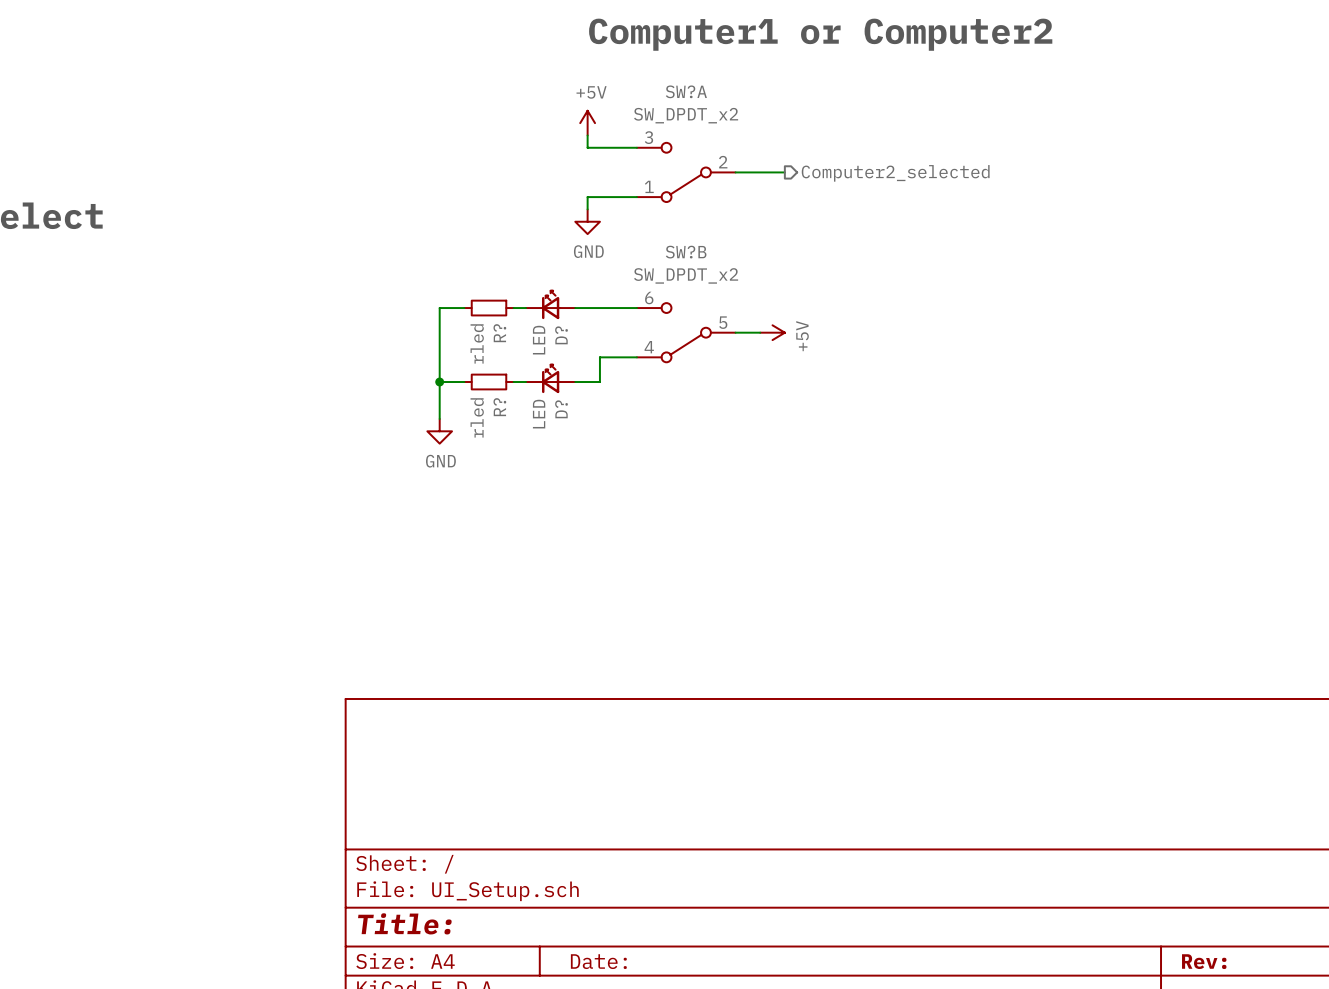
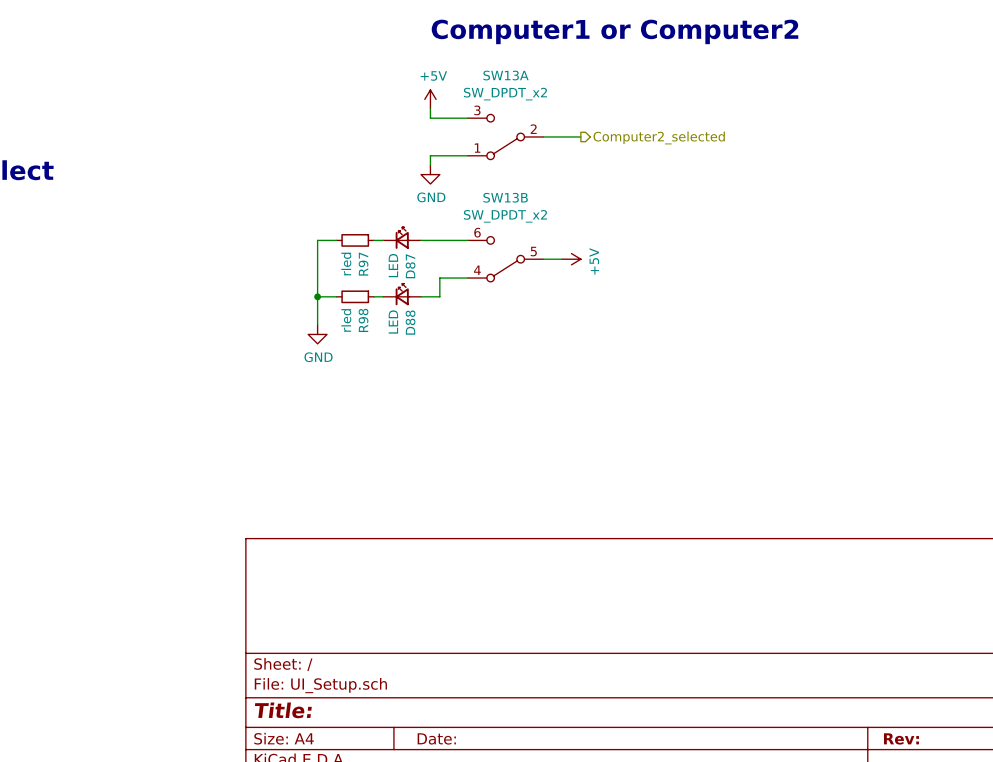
SW?A name: SW?A (686, 91) -> SW13A (506, 75)
SW?B name: SW?B (686, 252) -> SW13B (505, 197)
R? name: R? (499, 333) -> R97 (363, 264)
D? name: D? (561, 335) -> D87 (410, 266)
R? name: R? (499, 407) -> R98 (363, 320)
D? name: D? (561, 409) -> D88 (410, 322)

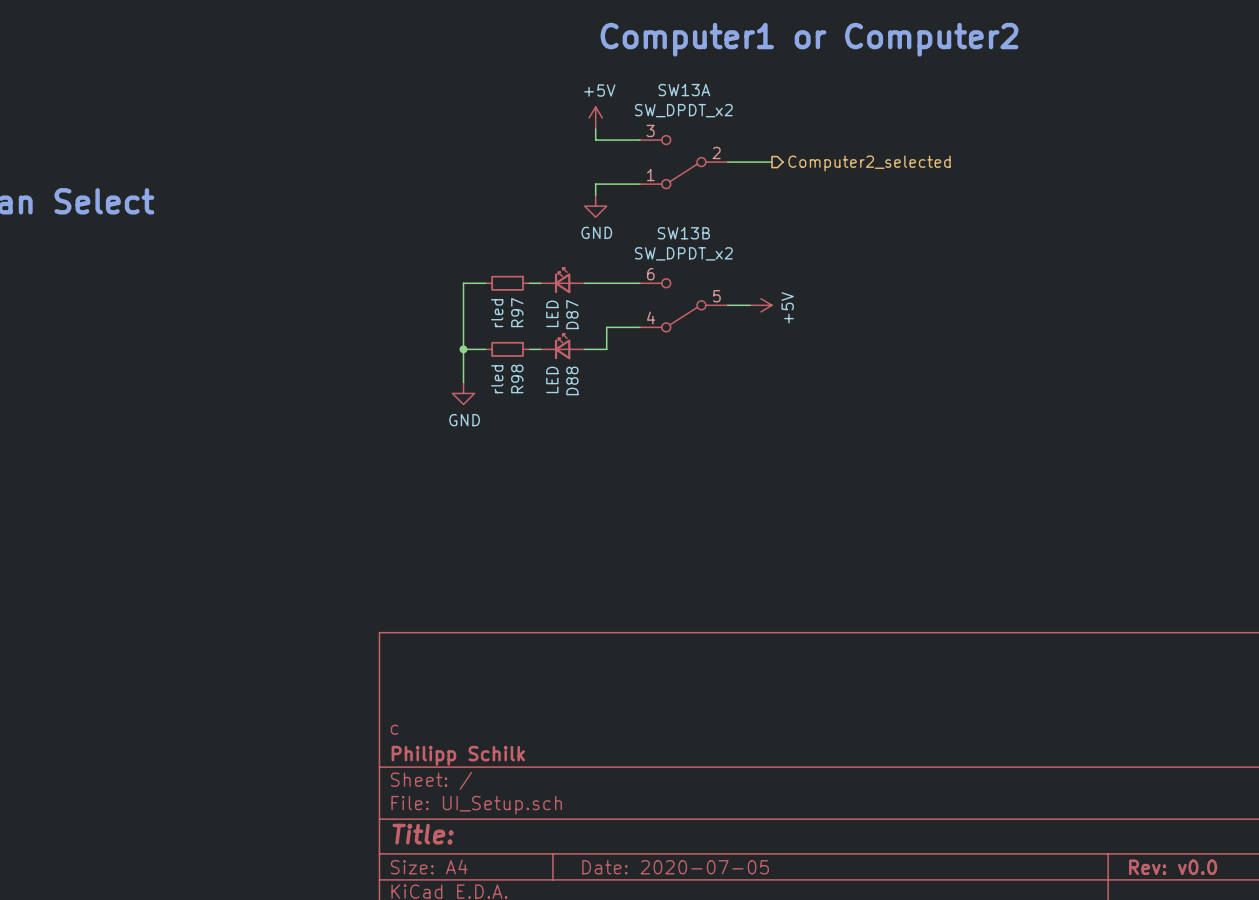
title block: none -> c (394, 729)
title block: none -> Philipp Schilk (458, 755)
title block: Date: (436, 738) -> Date: 2020-07-05 (675, 867)
title block: Rev: (901, 738) -> Rev: v0.0 (1173, 867)

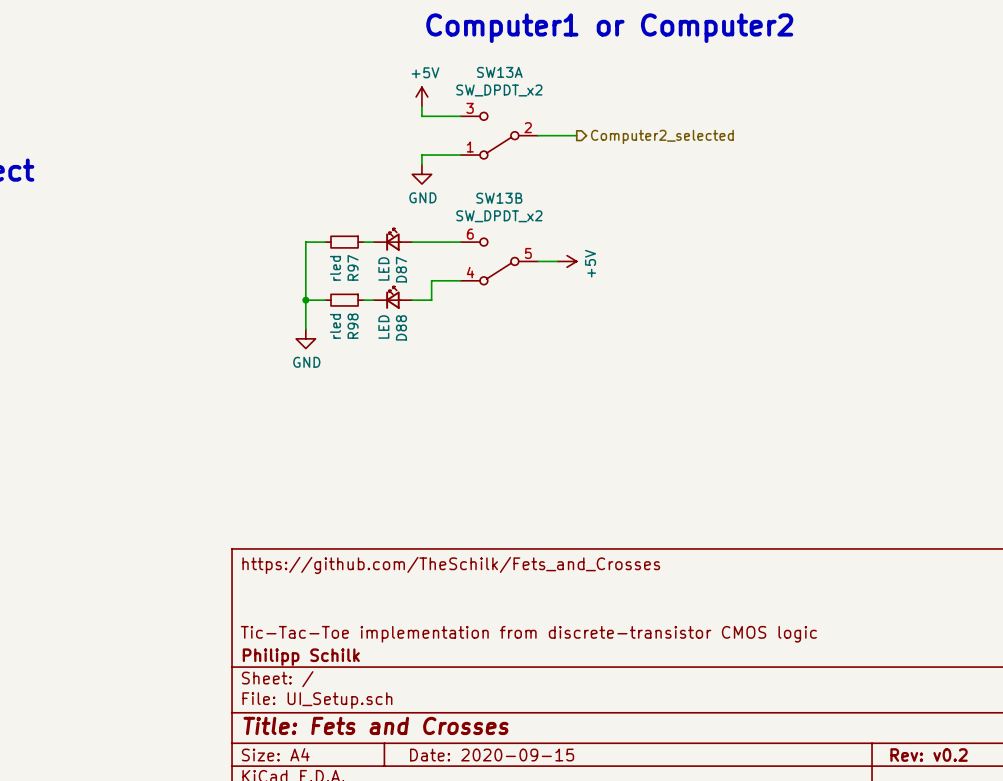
title block: none -> https://github.com/TheSchilk/Fets_and_Crosses (451, 565)
title block: c (394, 729) -> Tic-Tac-Toe implementation from discrete-transistor CMOS logic (528, 634)
title block: Title: (423, 834) -> Title: Fets and Crosses (375, 725)
title block: Date: 2020-07-05 (675, 867) -> Date: 2020-09-15 (492, 755)
title block: Rev: v0.0 (1173, 867) -> Rev: v0.2 (929, 755)

